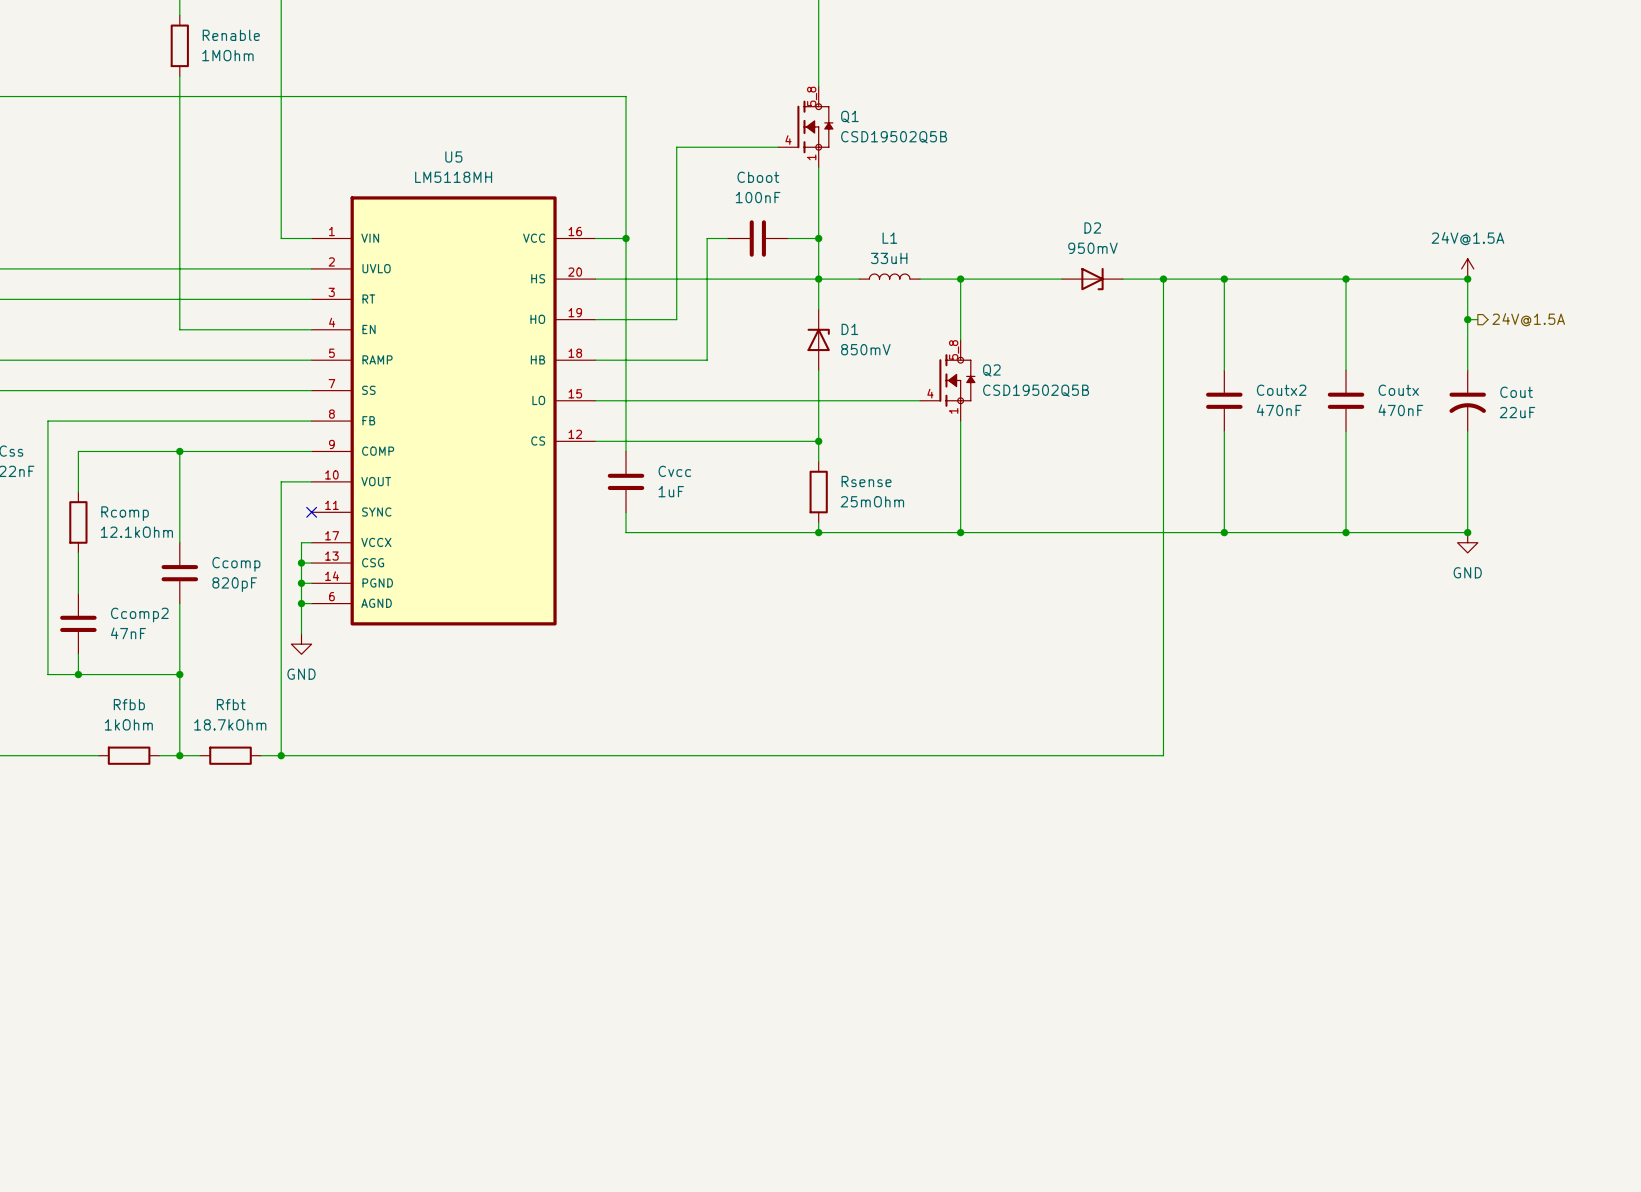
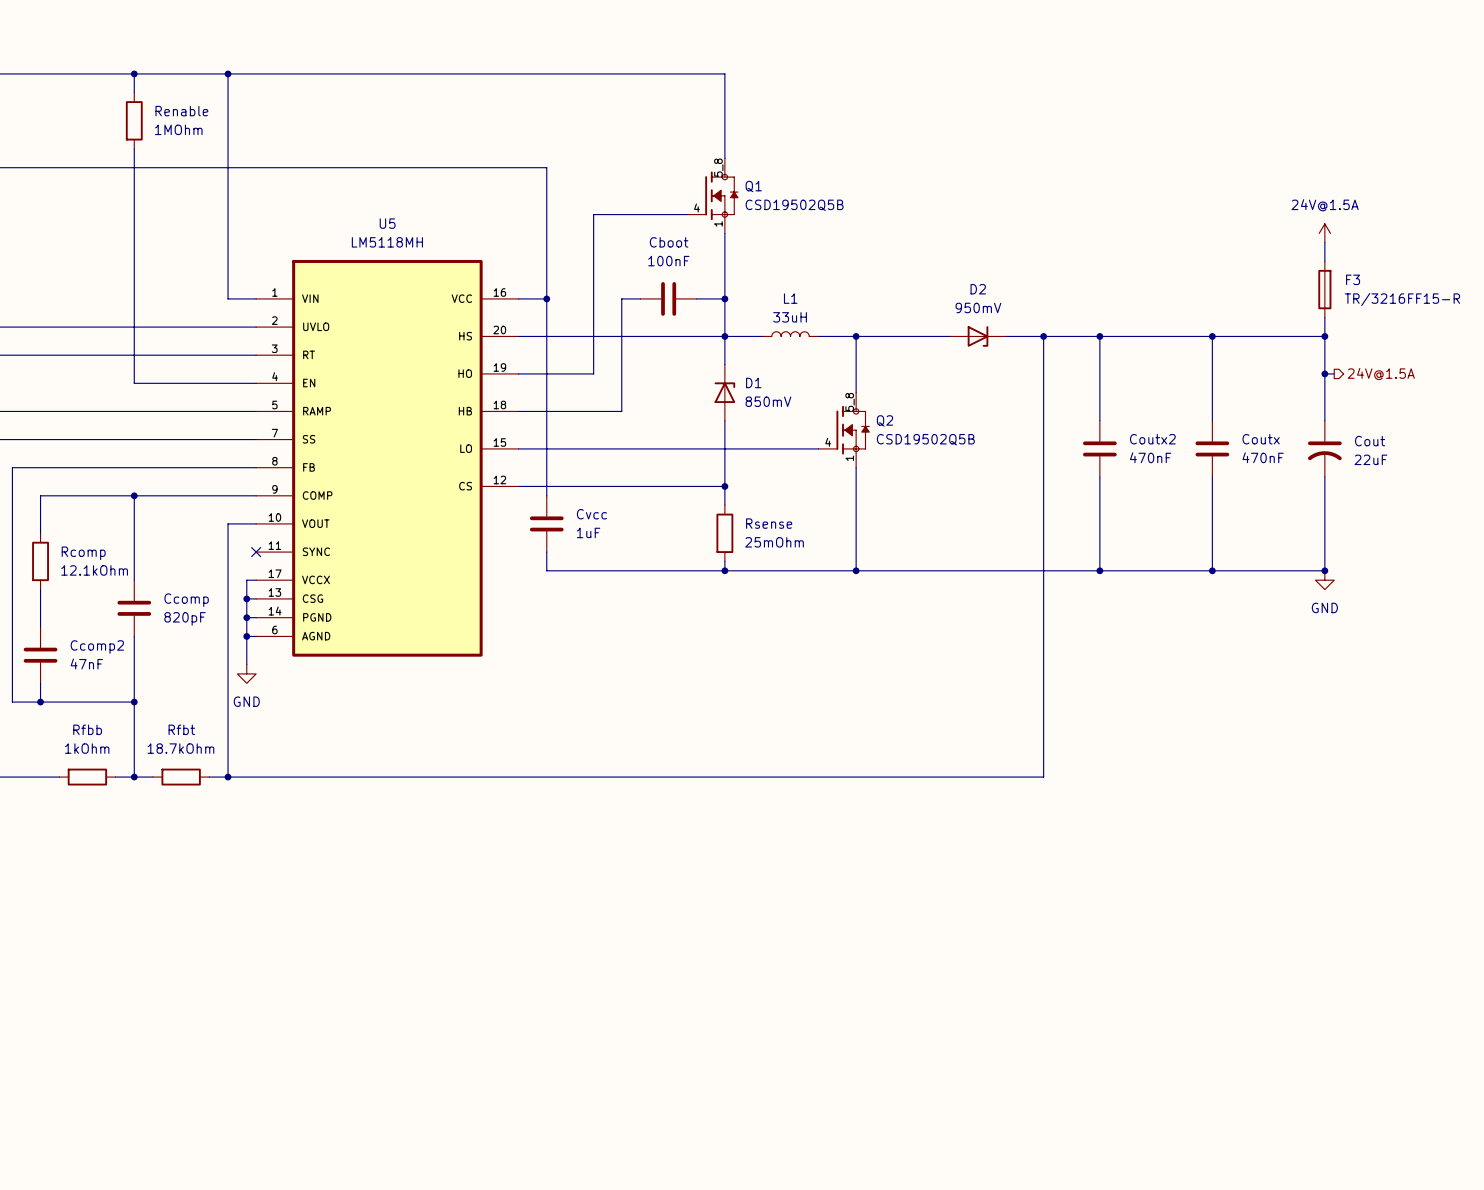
wire: none -> (1324, 242) (1324, 261)
F3: none -> TR/3216FF15-R (1324, 289)
power symbol position: 24V@1.5A (1467, 268) -> 24V@1.5A (1324, 233)

